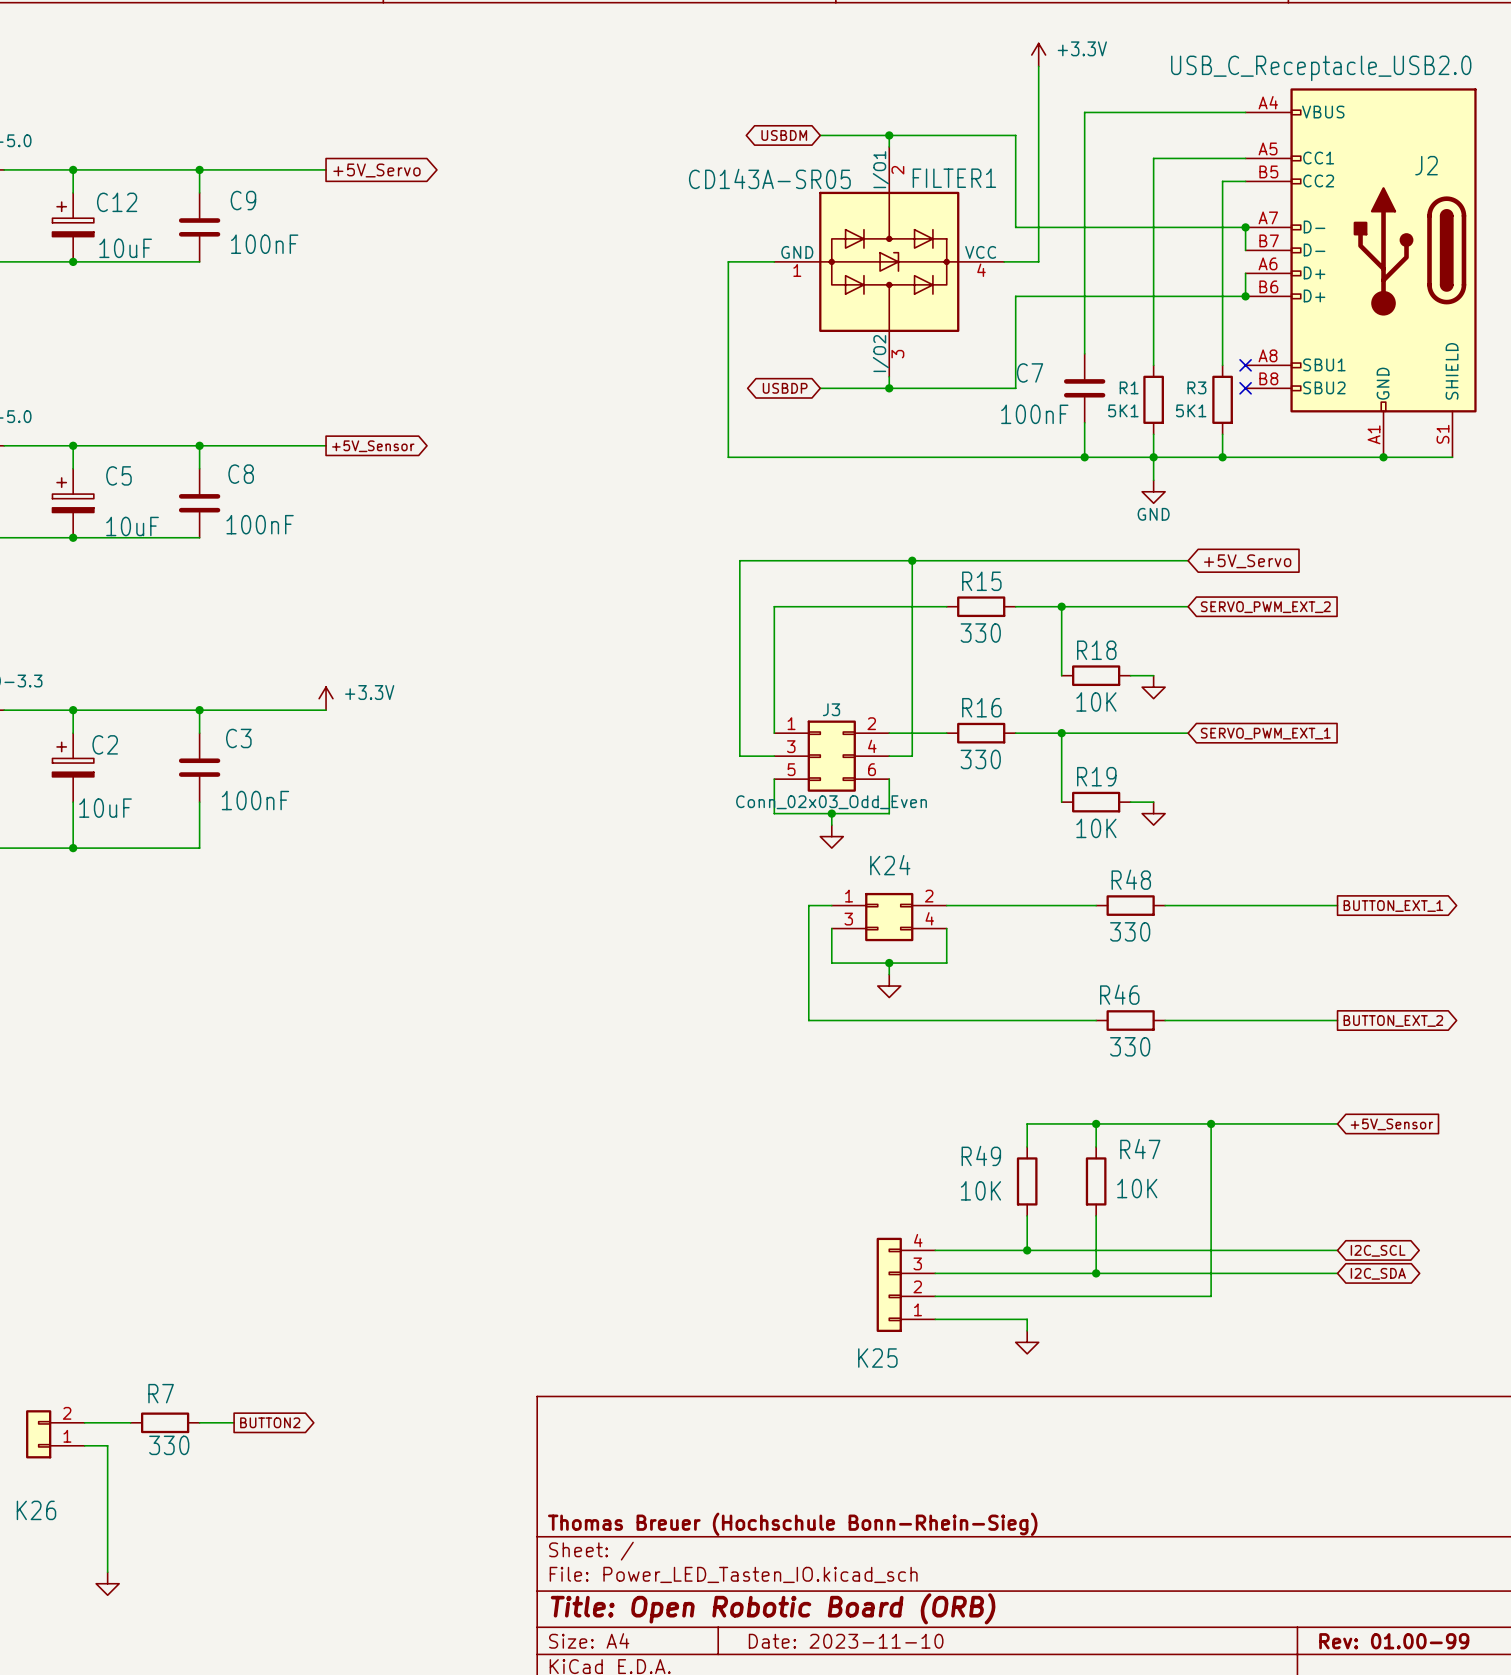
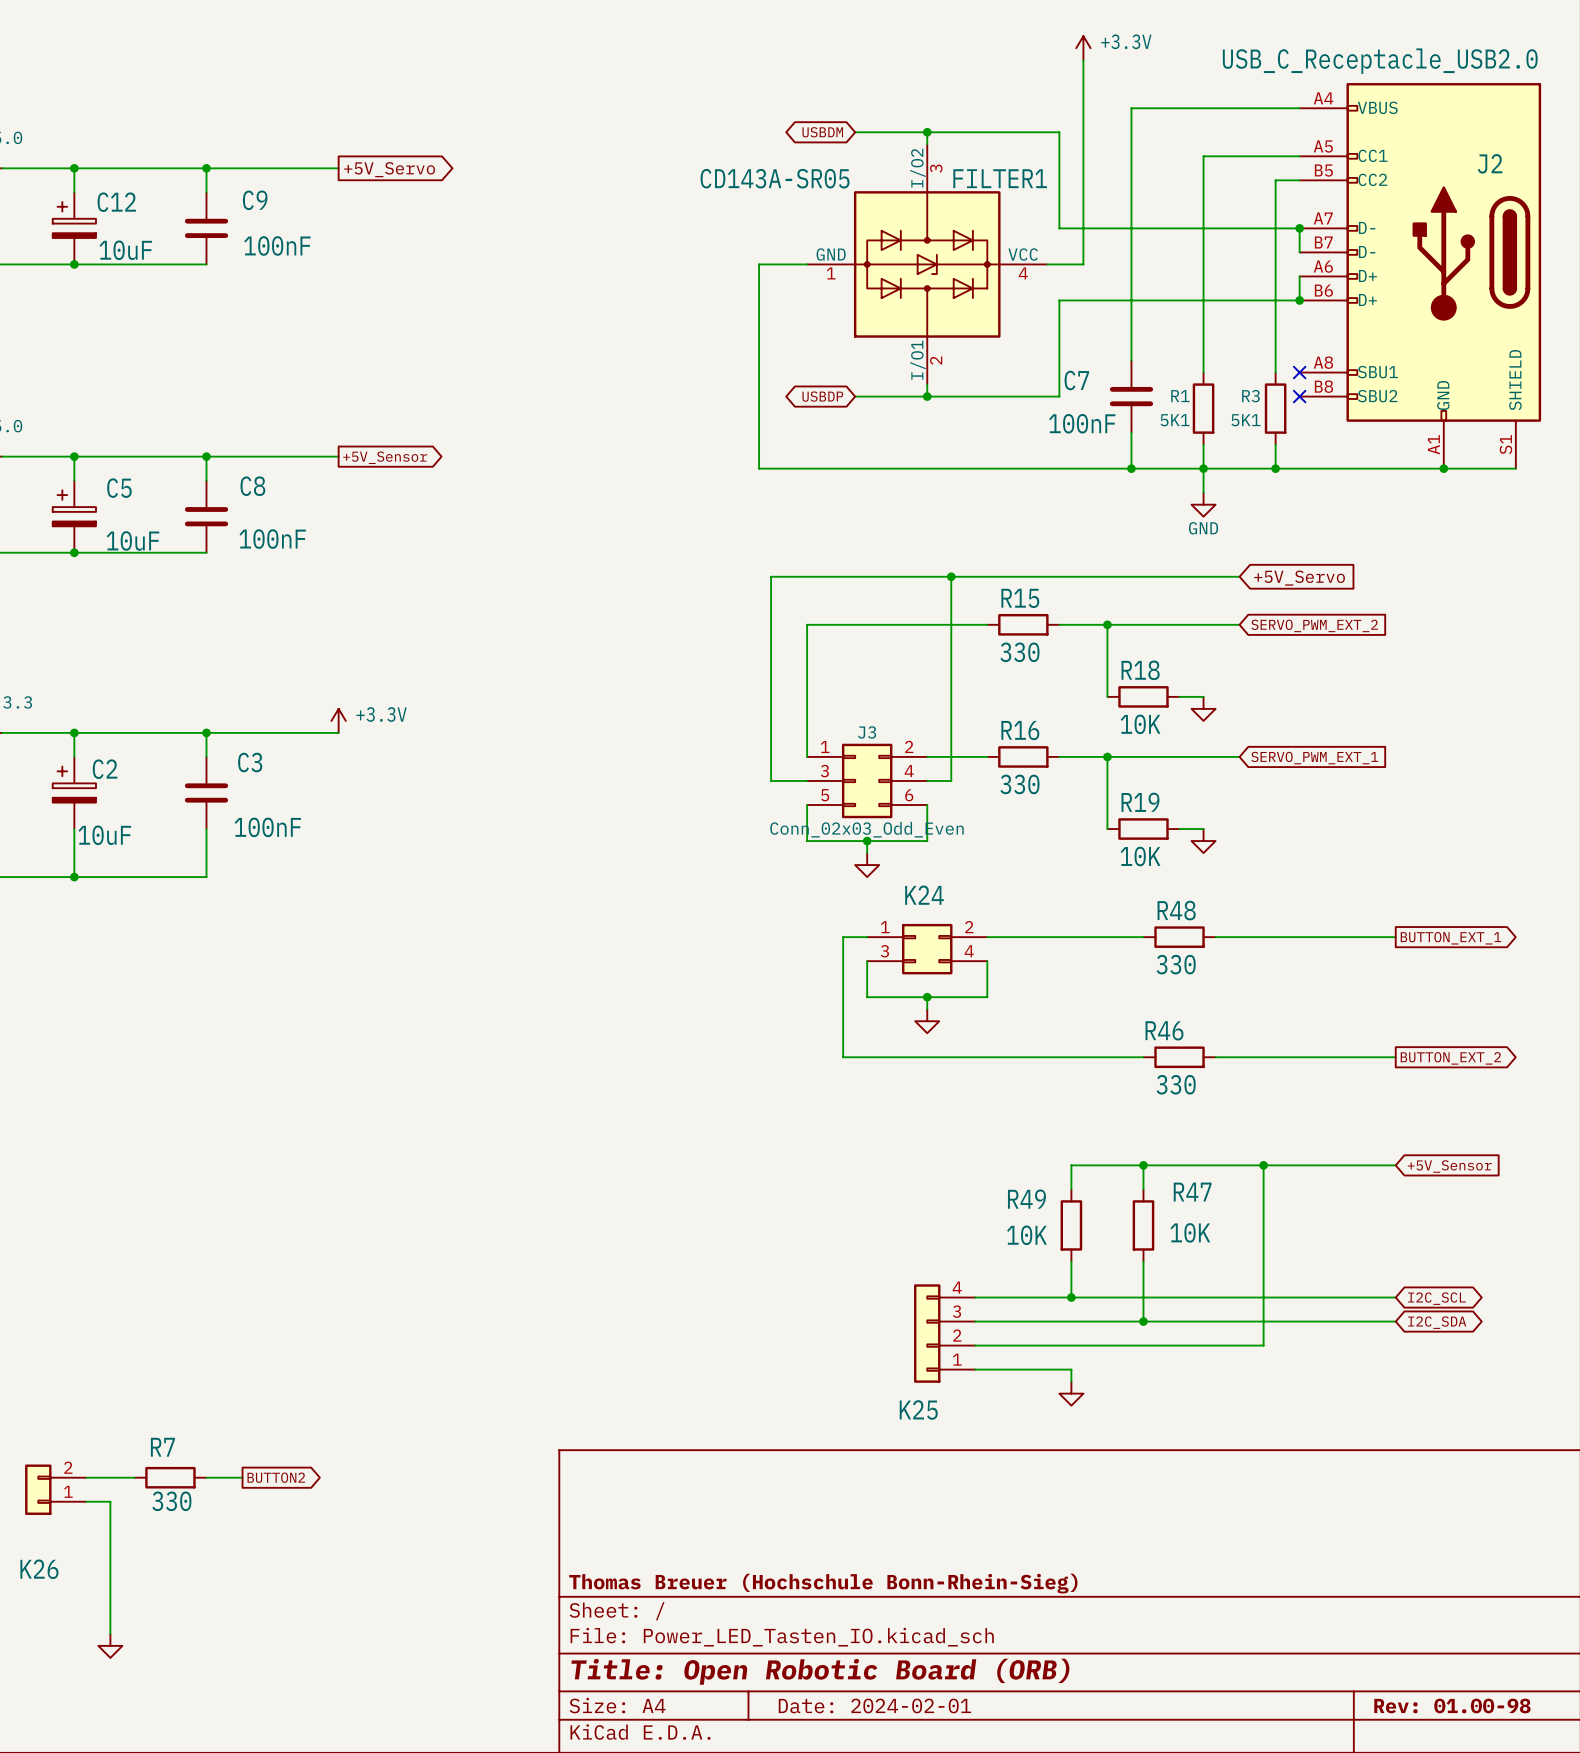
FILTER1 flip: as is (889, 261) -> up-down (927, 264)
title block: Date: 2023-11-10 (846, 1641) -> Date: 2024-02-01 (874, 1705)
title block: Rev: 01.00-99 (1394, 1641) -> Rev: 01.00-98 (1452, 1705)

